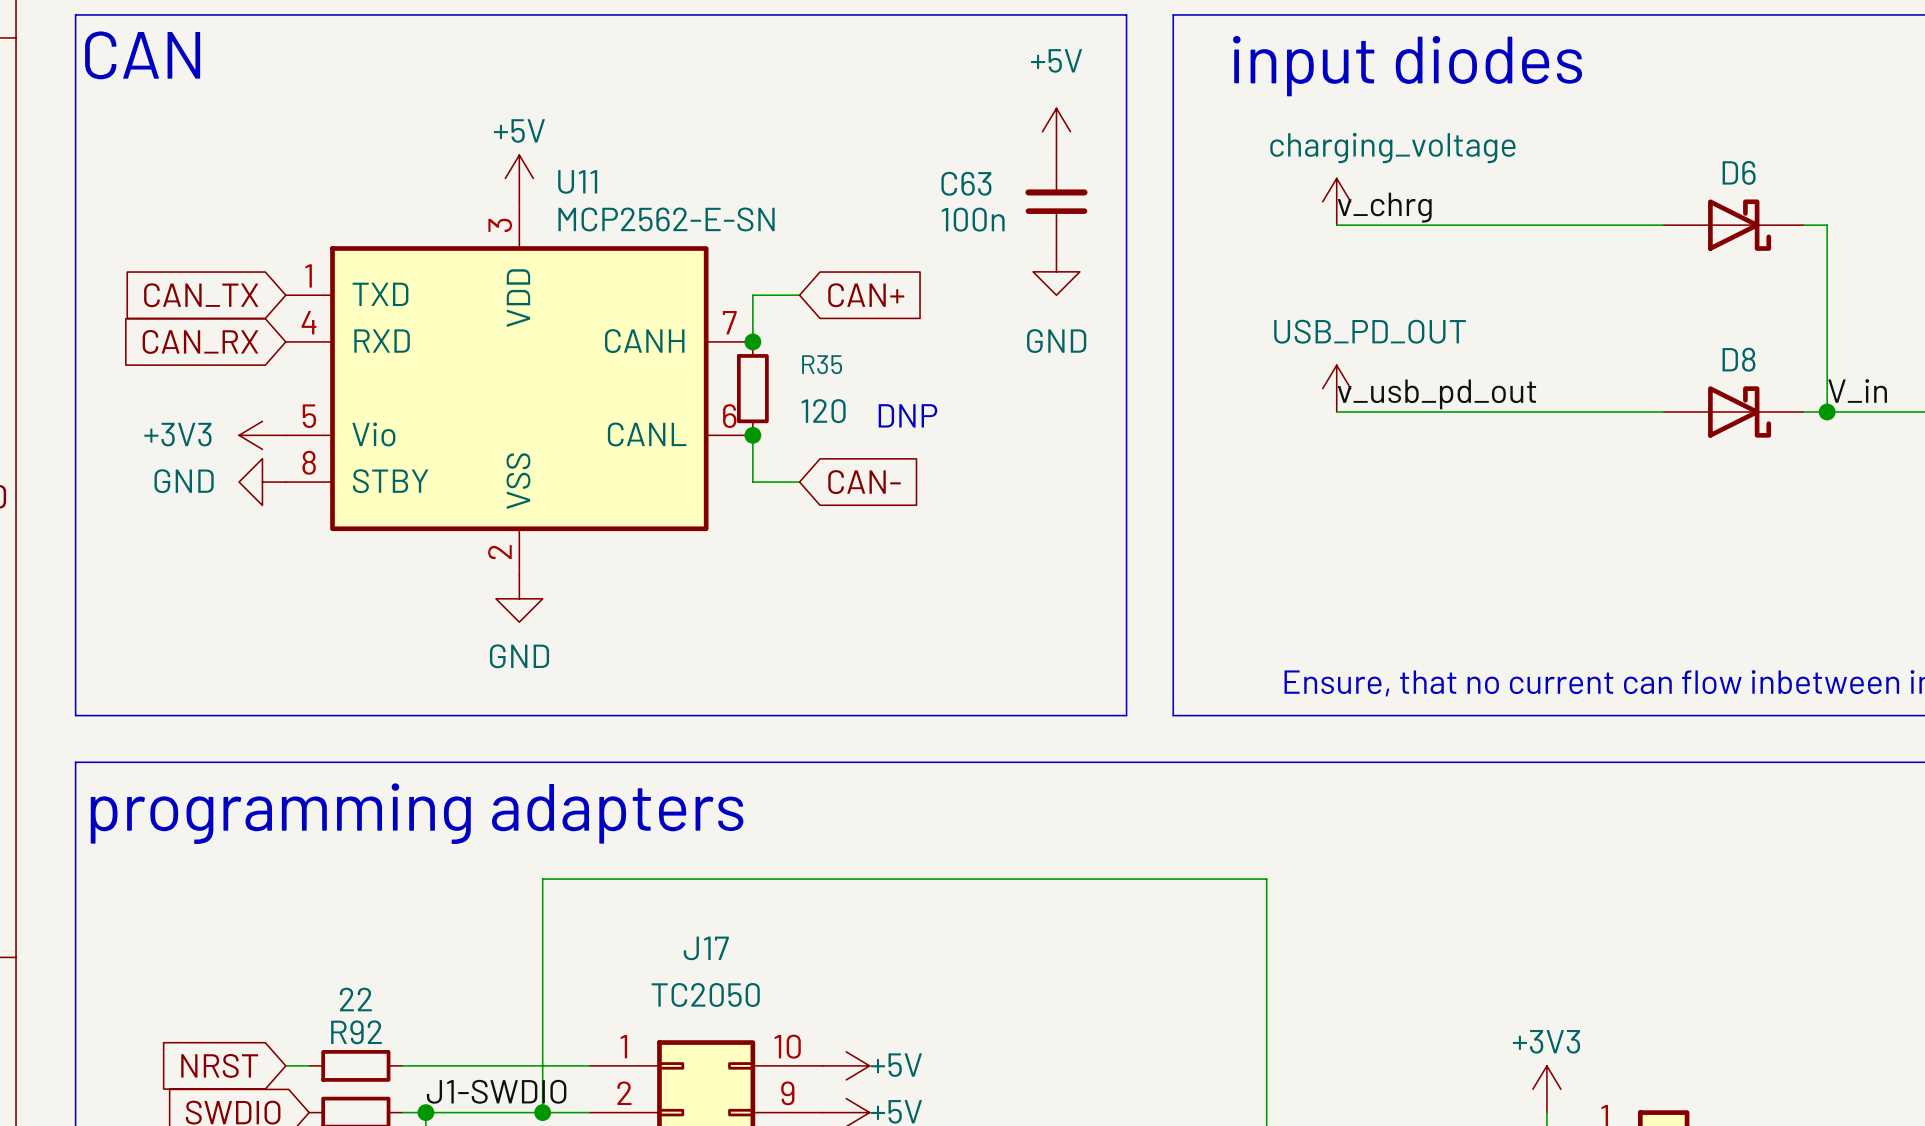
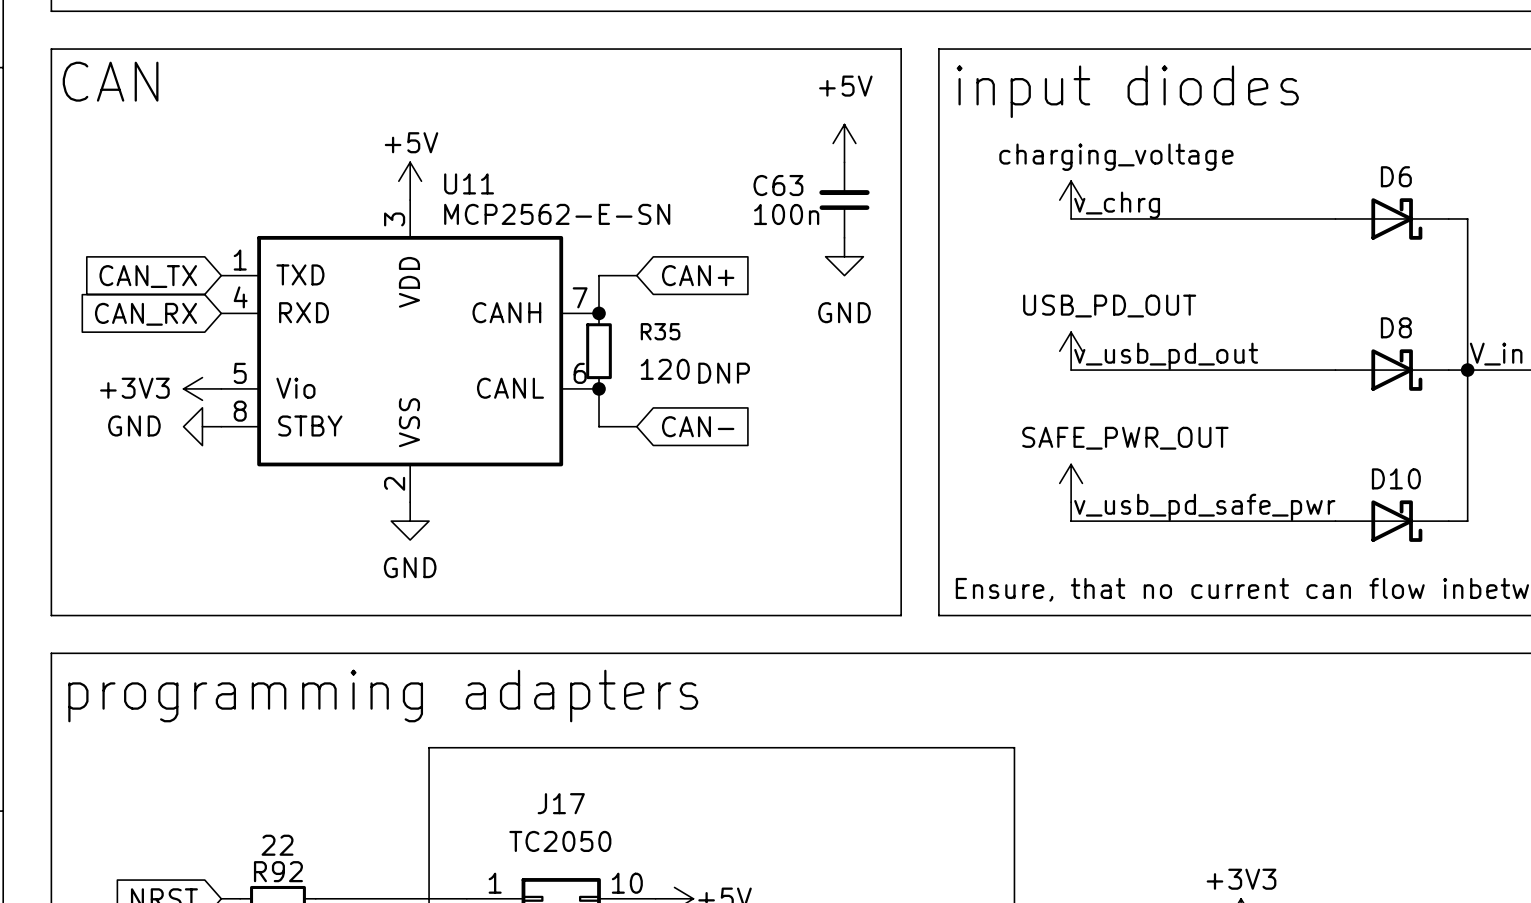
wire: none -> (1467, 370) (1467, 521) (1448, 521)
power symbol: none -> SAFE_PWR_OUT (1071, 483)
wire: none -> (1071, 502) (1071, 521) (1335, 521)
label: none -> v_usb_pd_safe_pwr (1204, 507)
D10: none -> (1392, 521)

